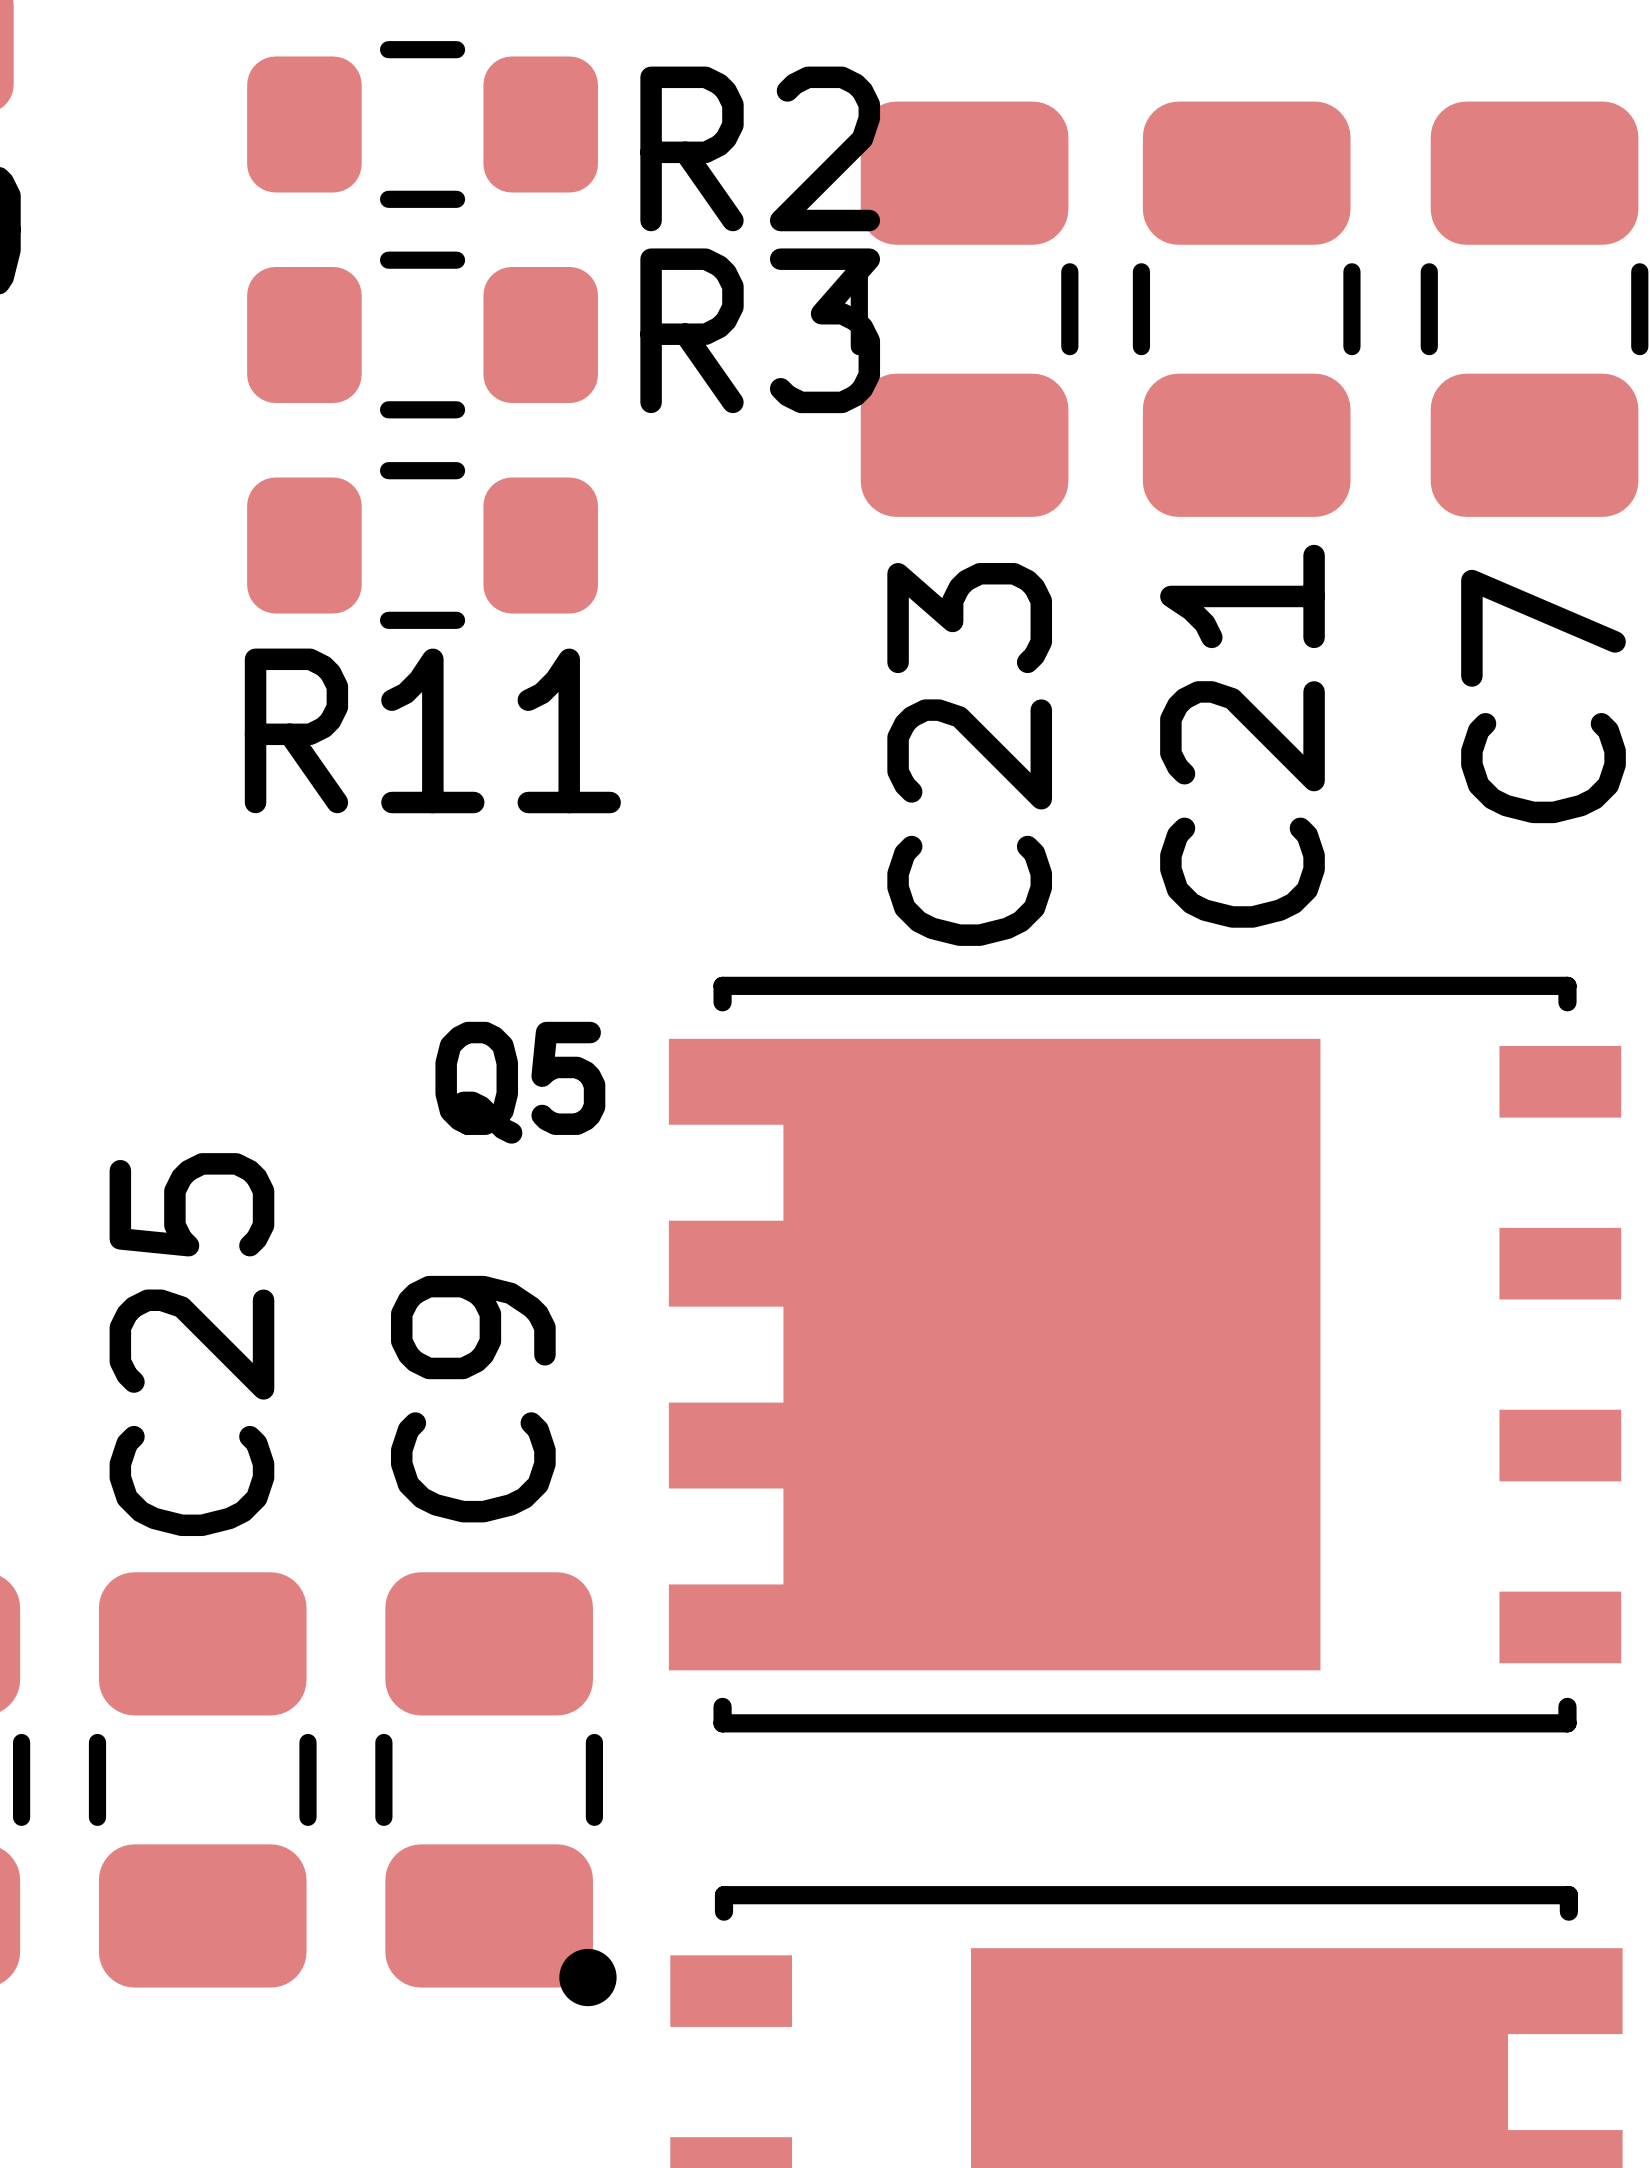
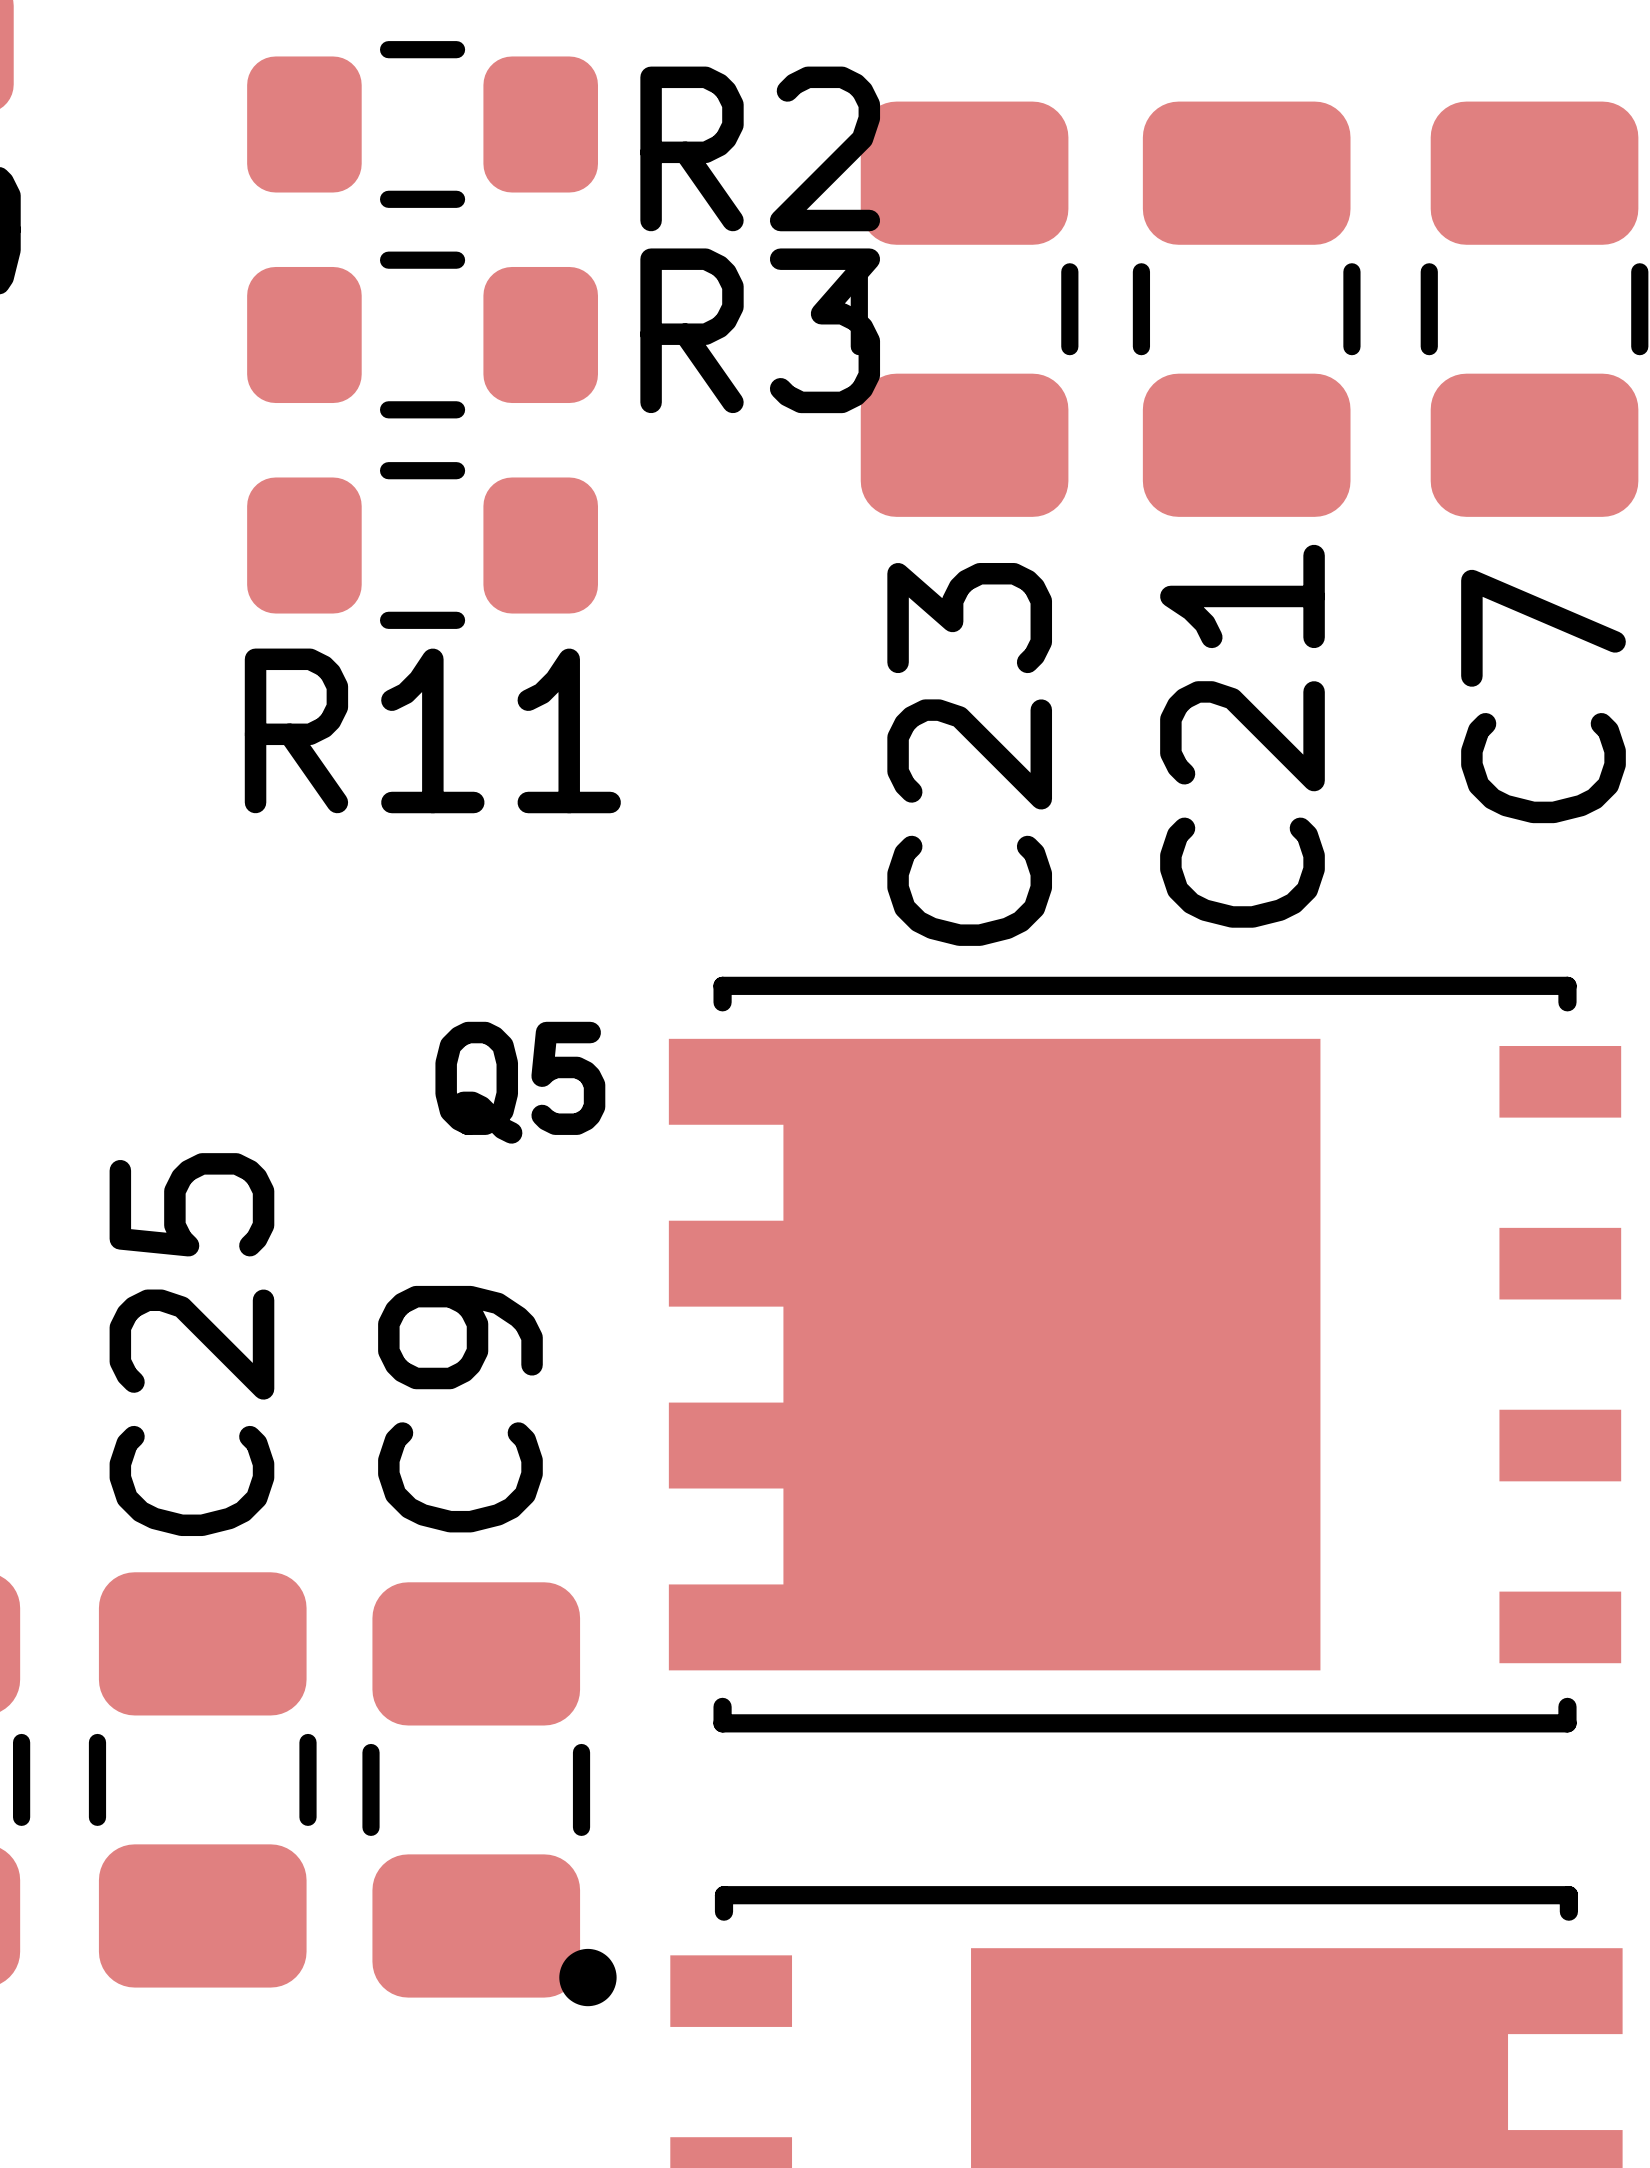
C9 position: (489, 1779) -> (476, 1789)

